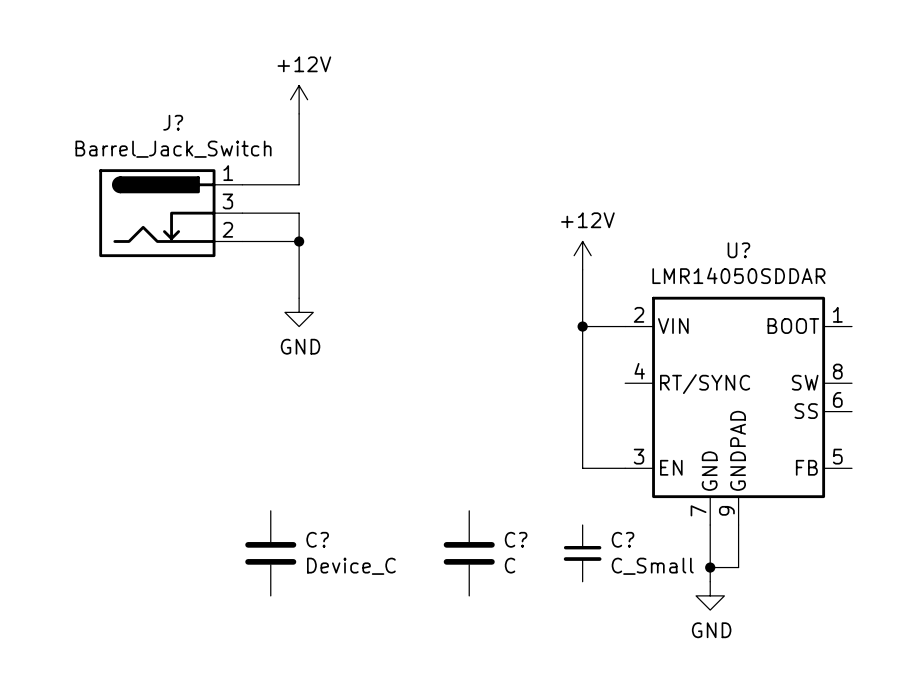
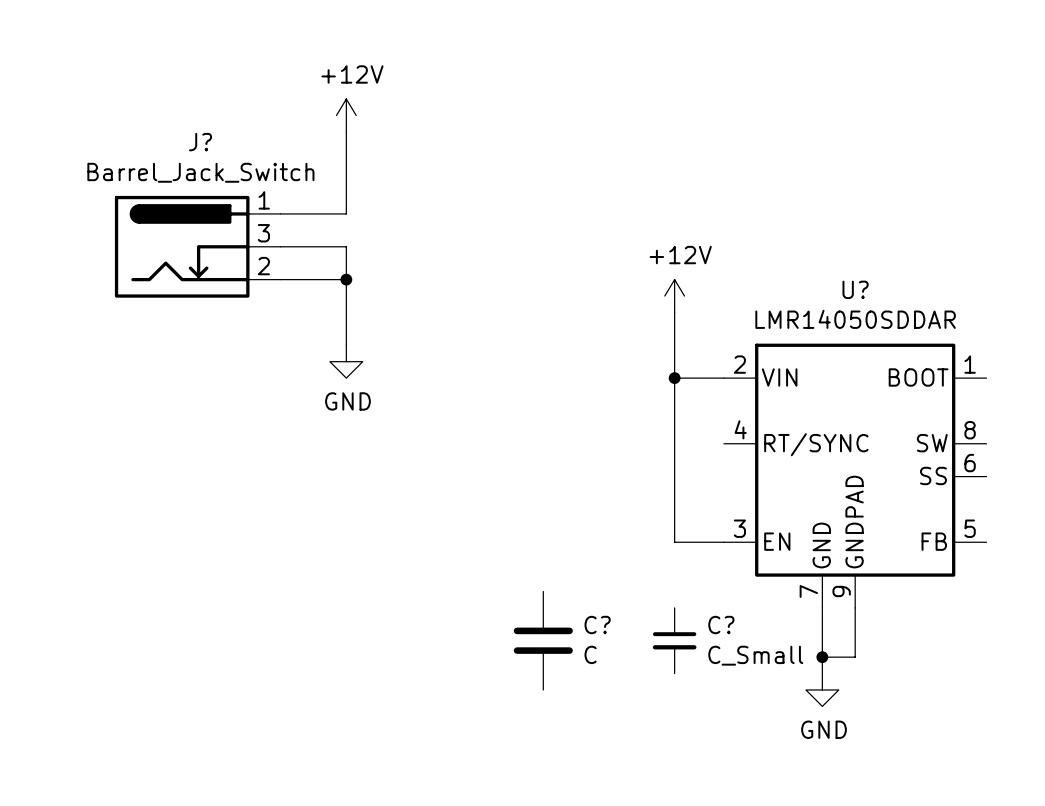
C?: Device_C (270, 553) -> none

